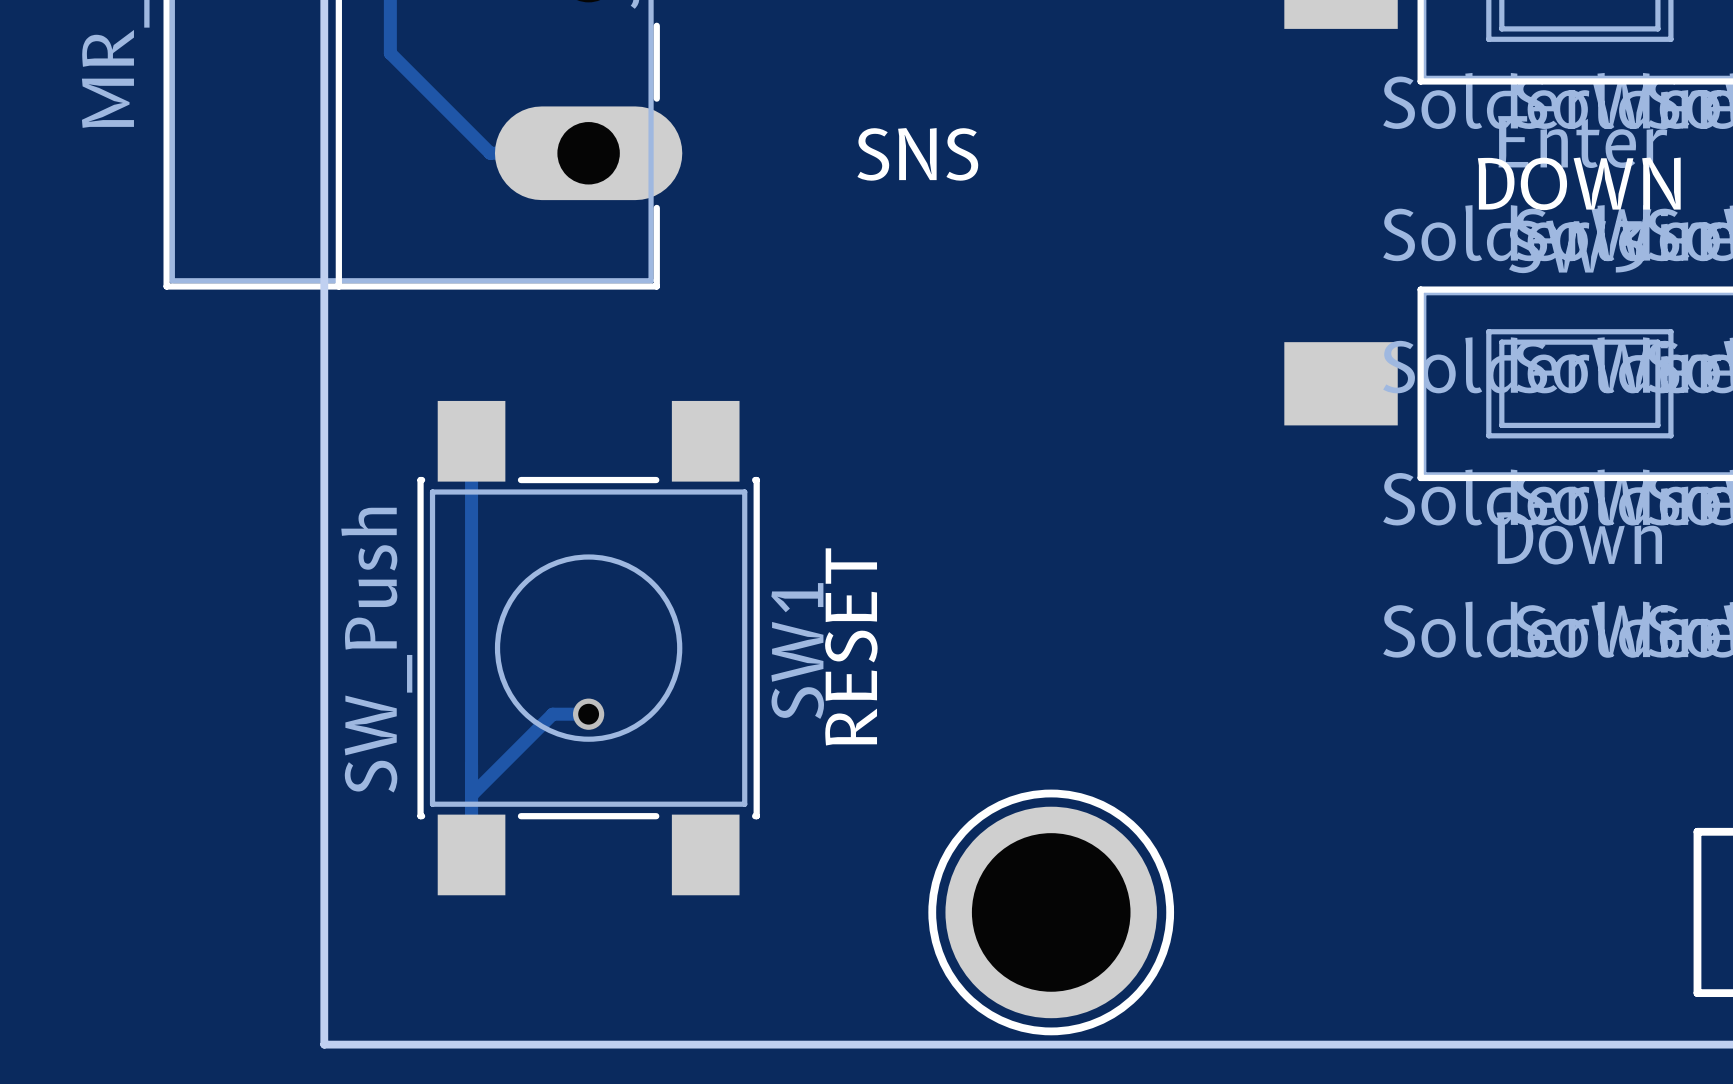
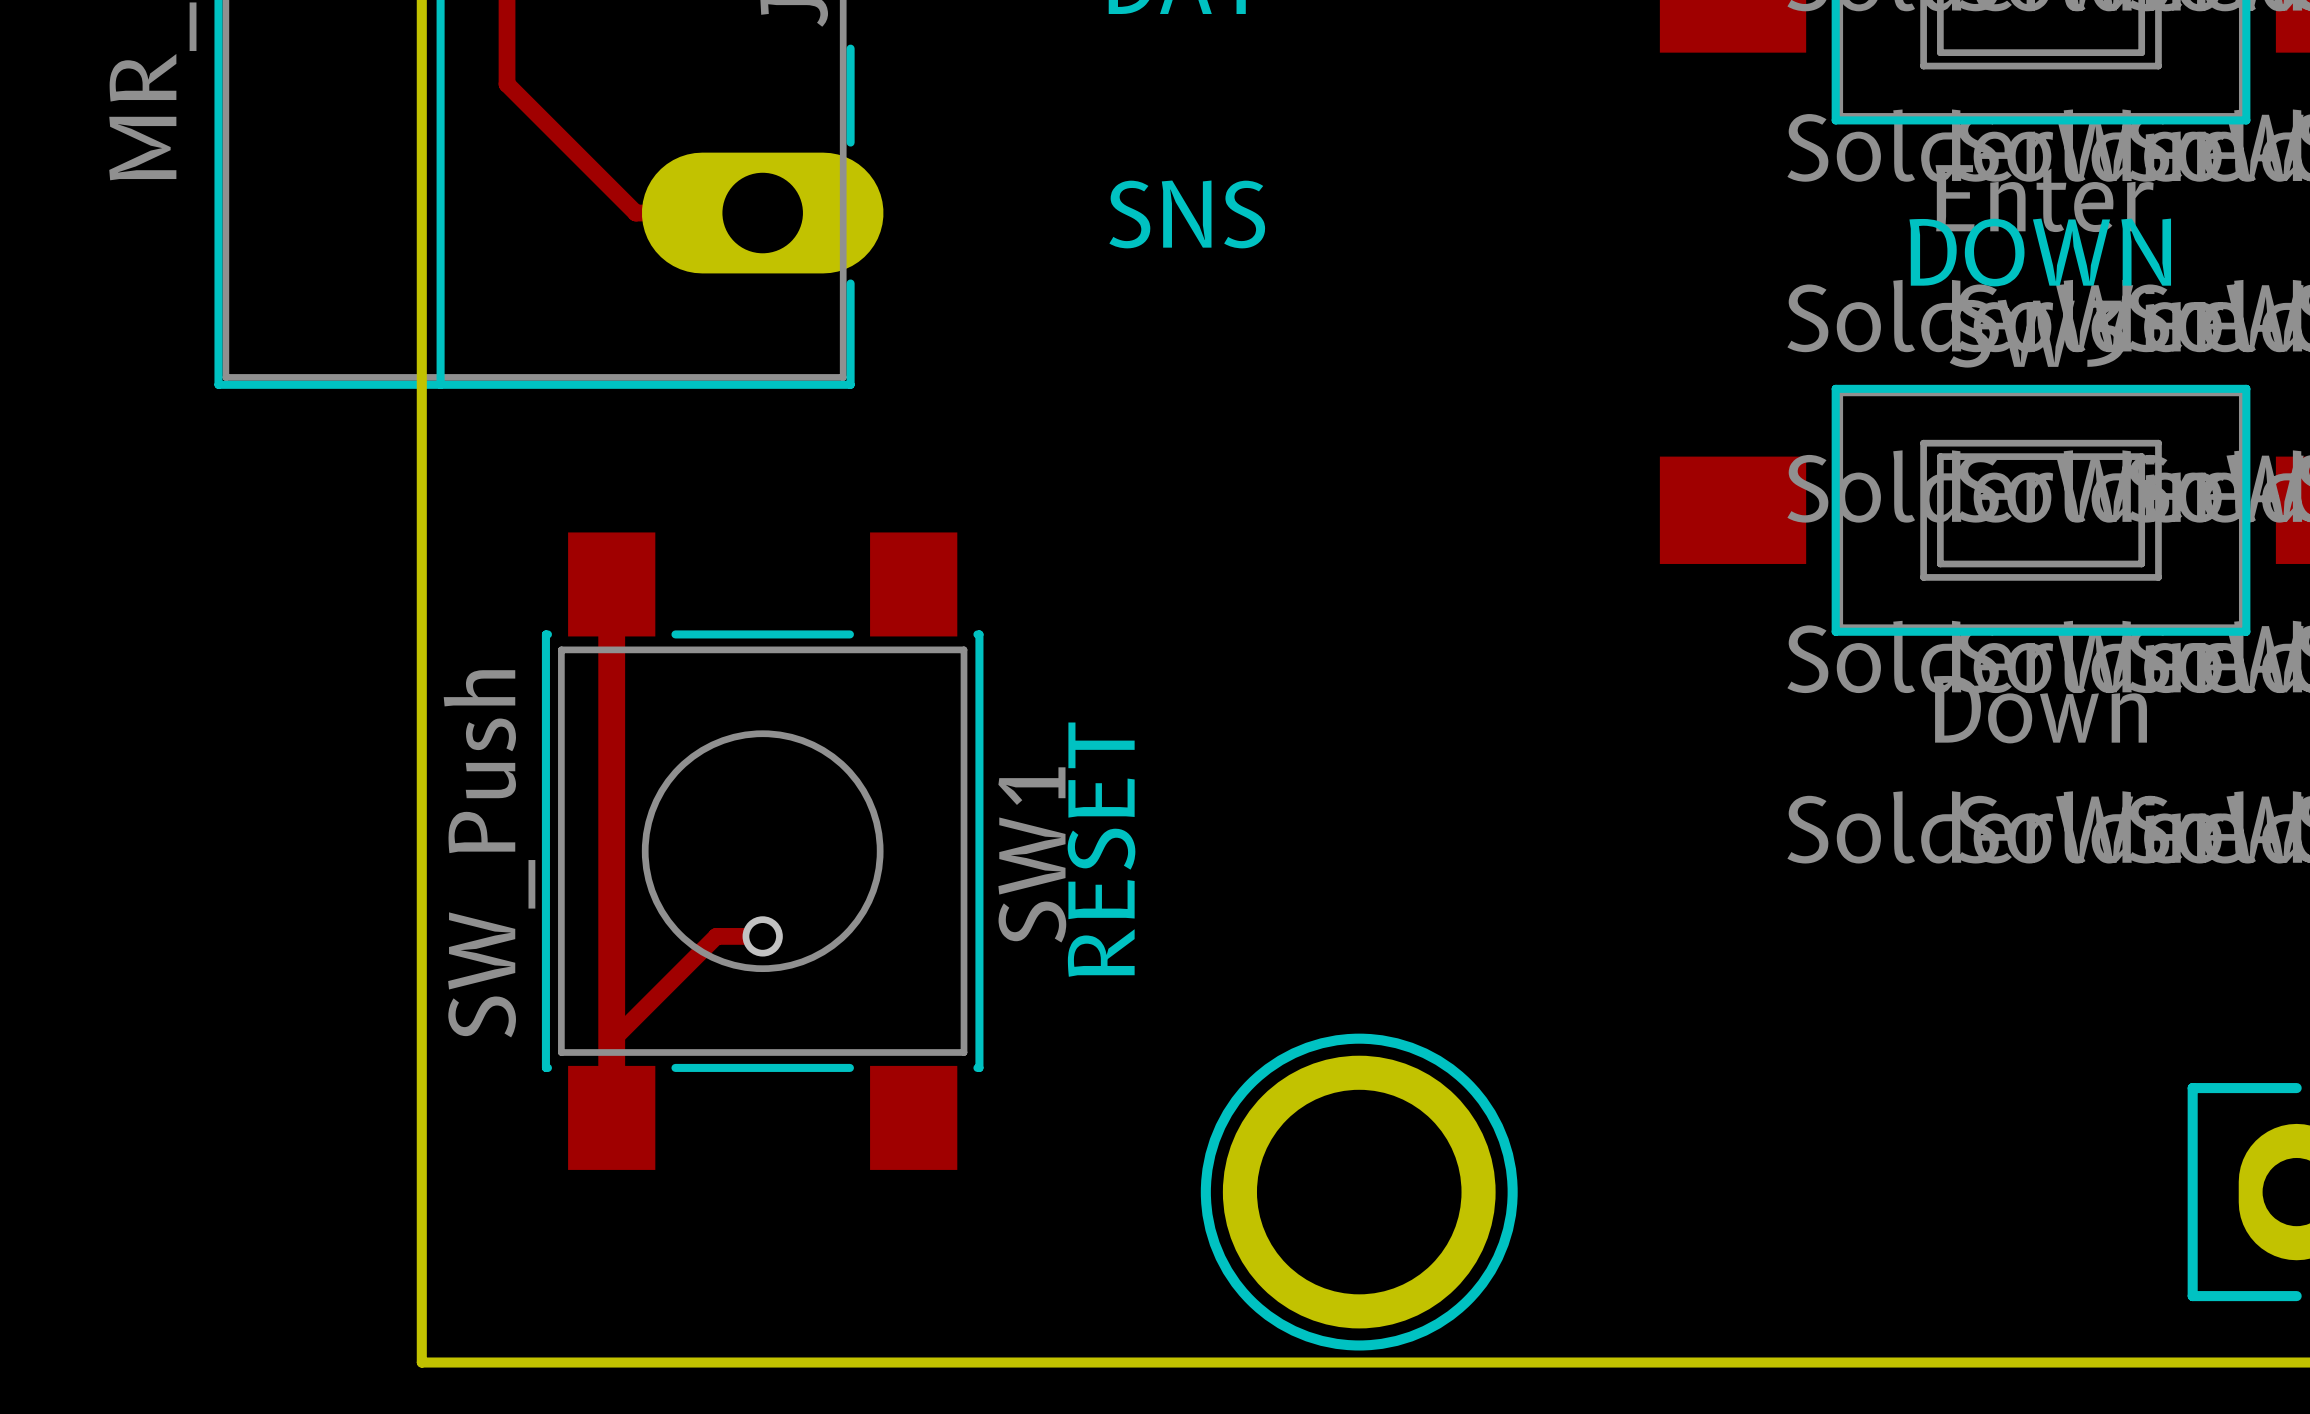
track width: thin (471, 441) (471, 854) -> thick (611, 584) (611, 1117)

